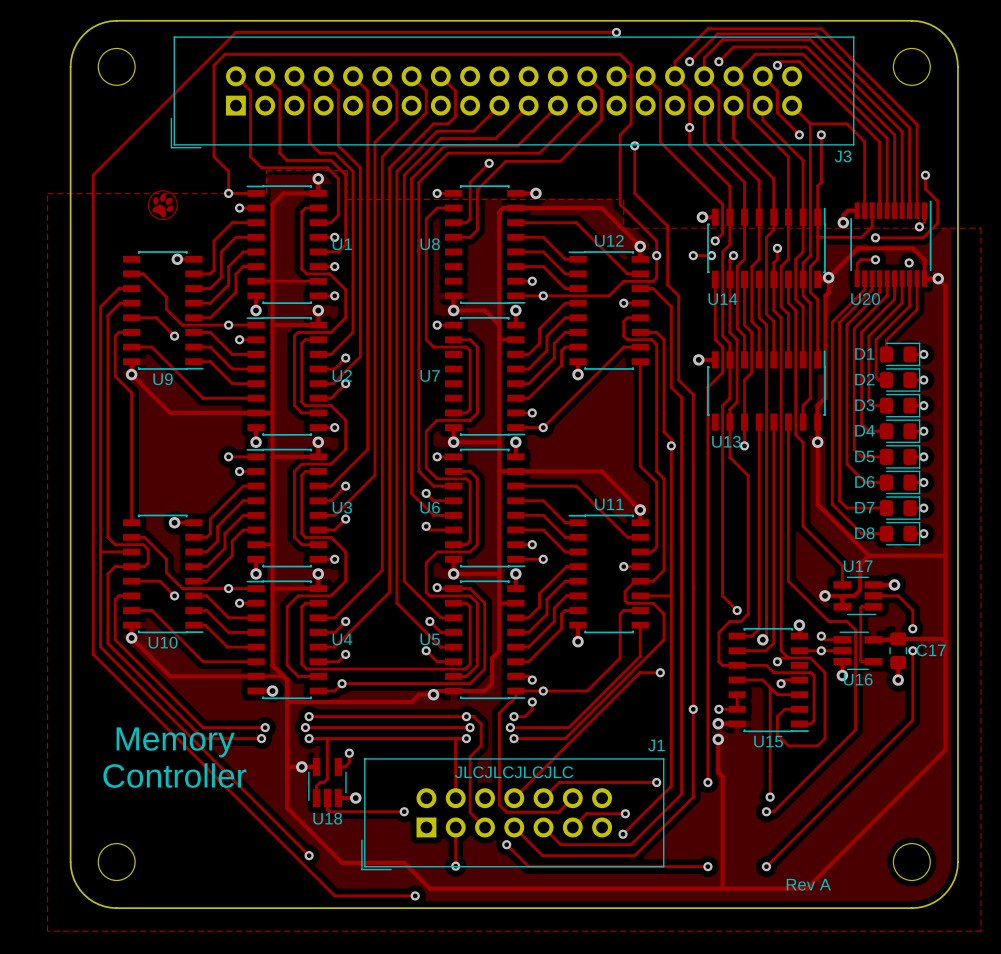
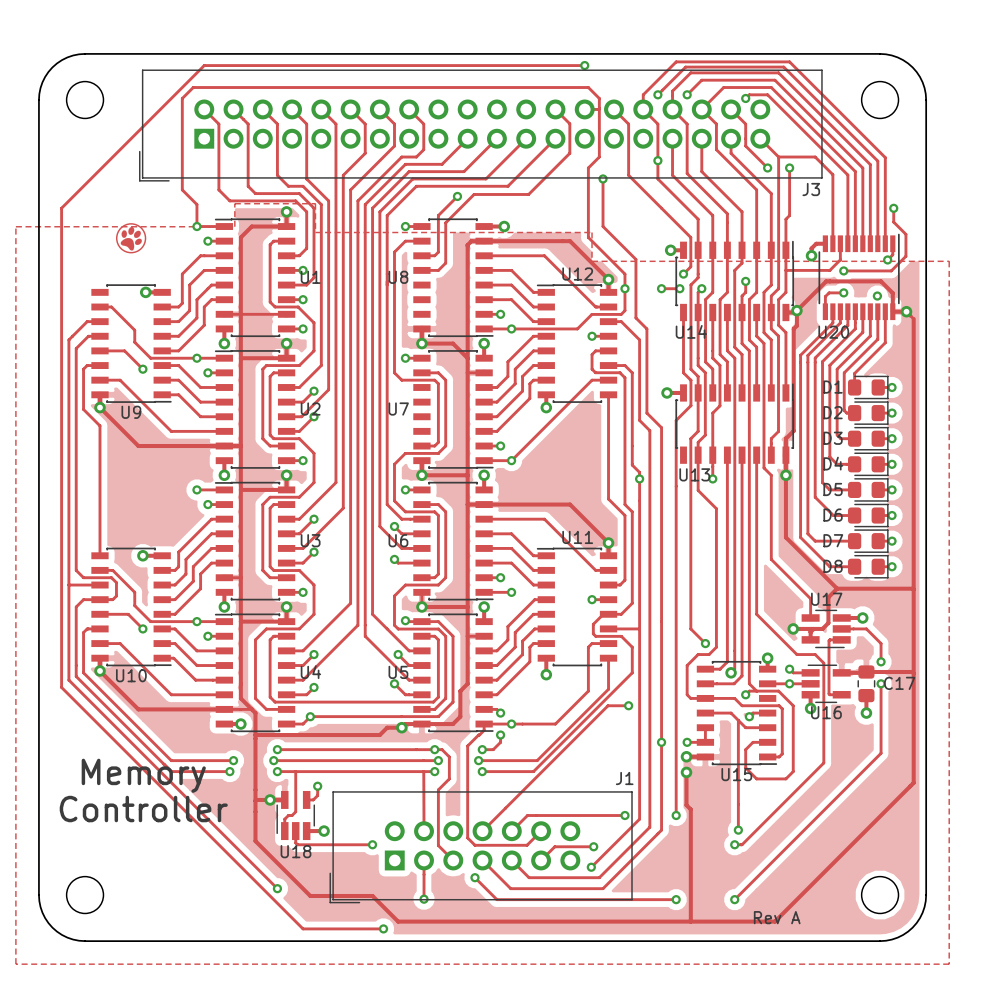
text: JLCJLCJLCJLC (514, 772) -> none

